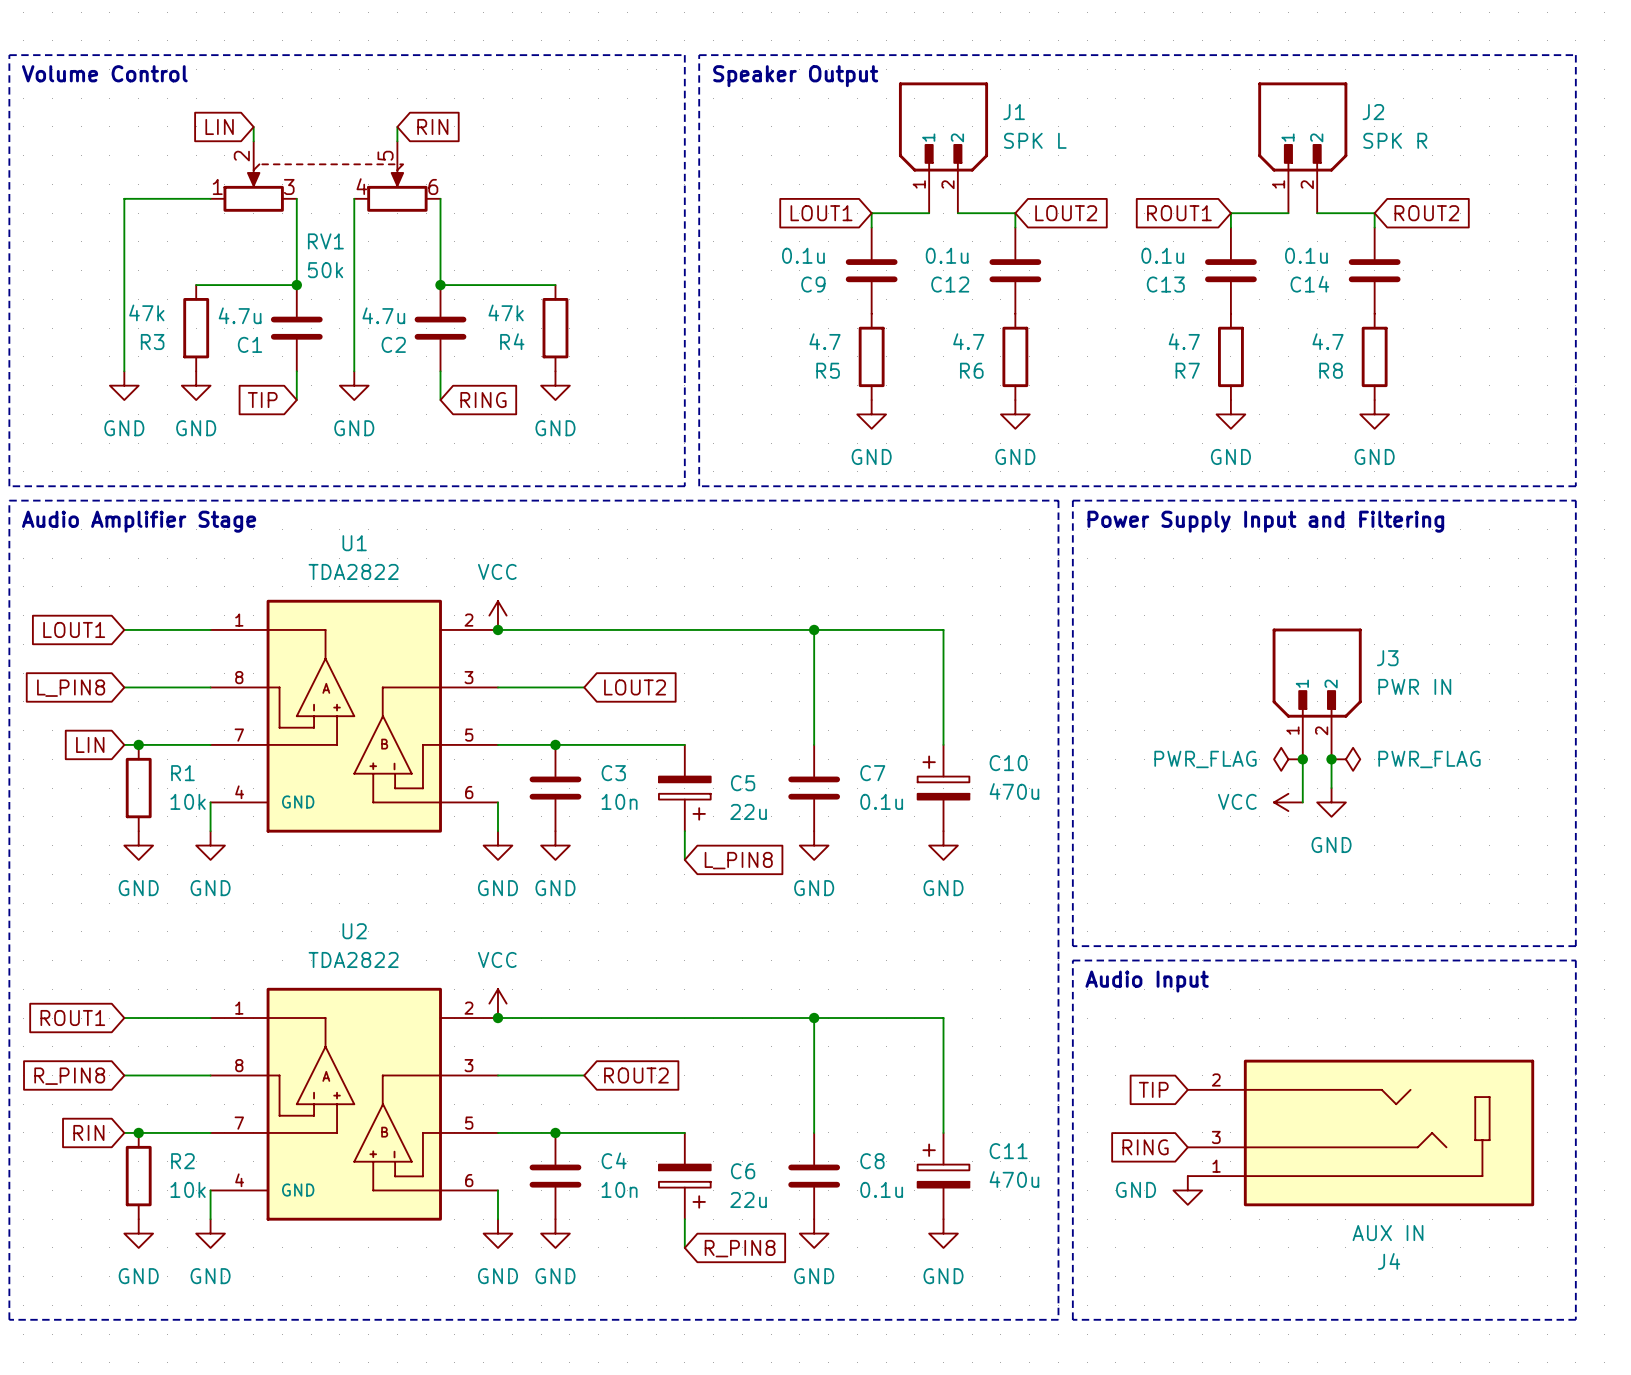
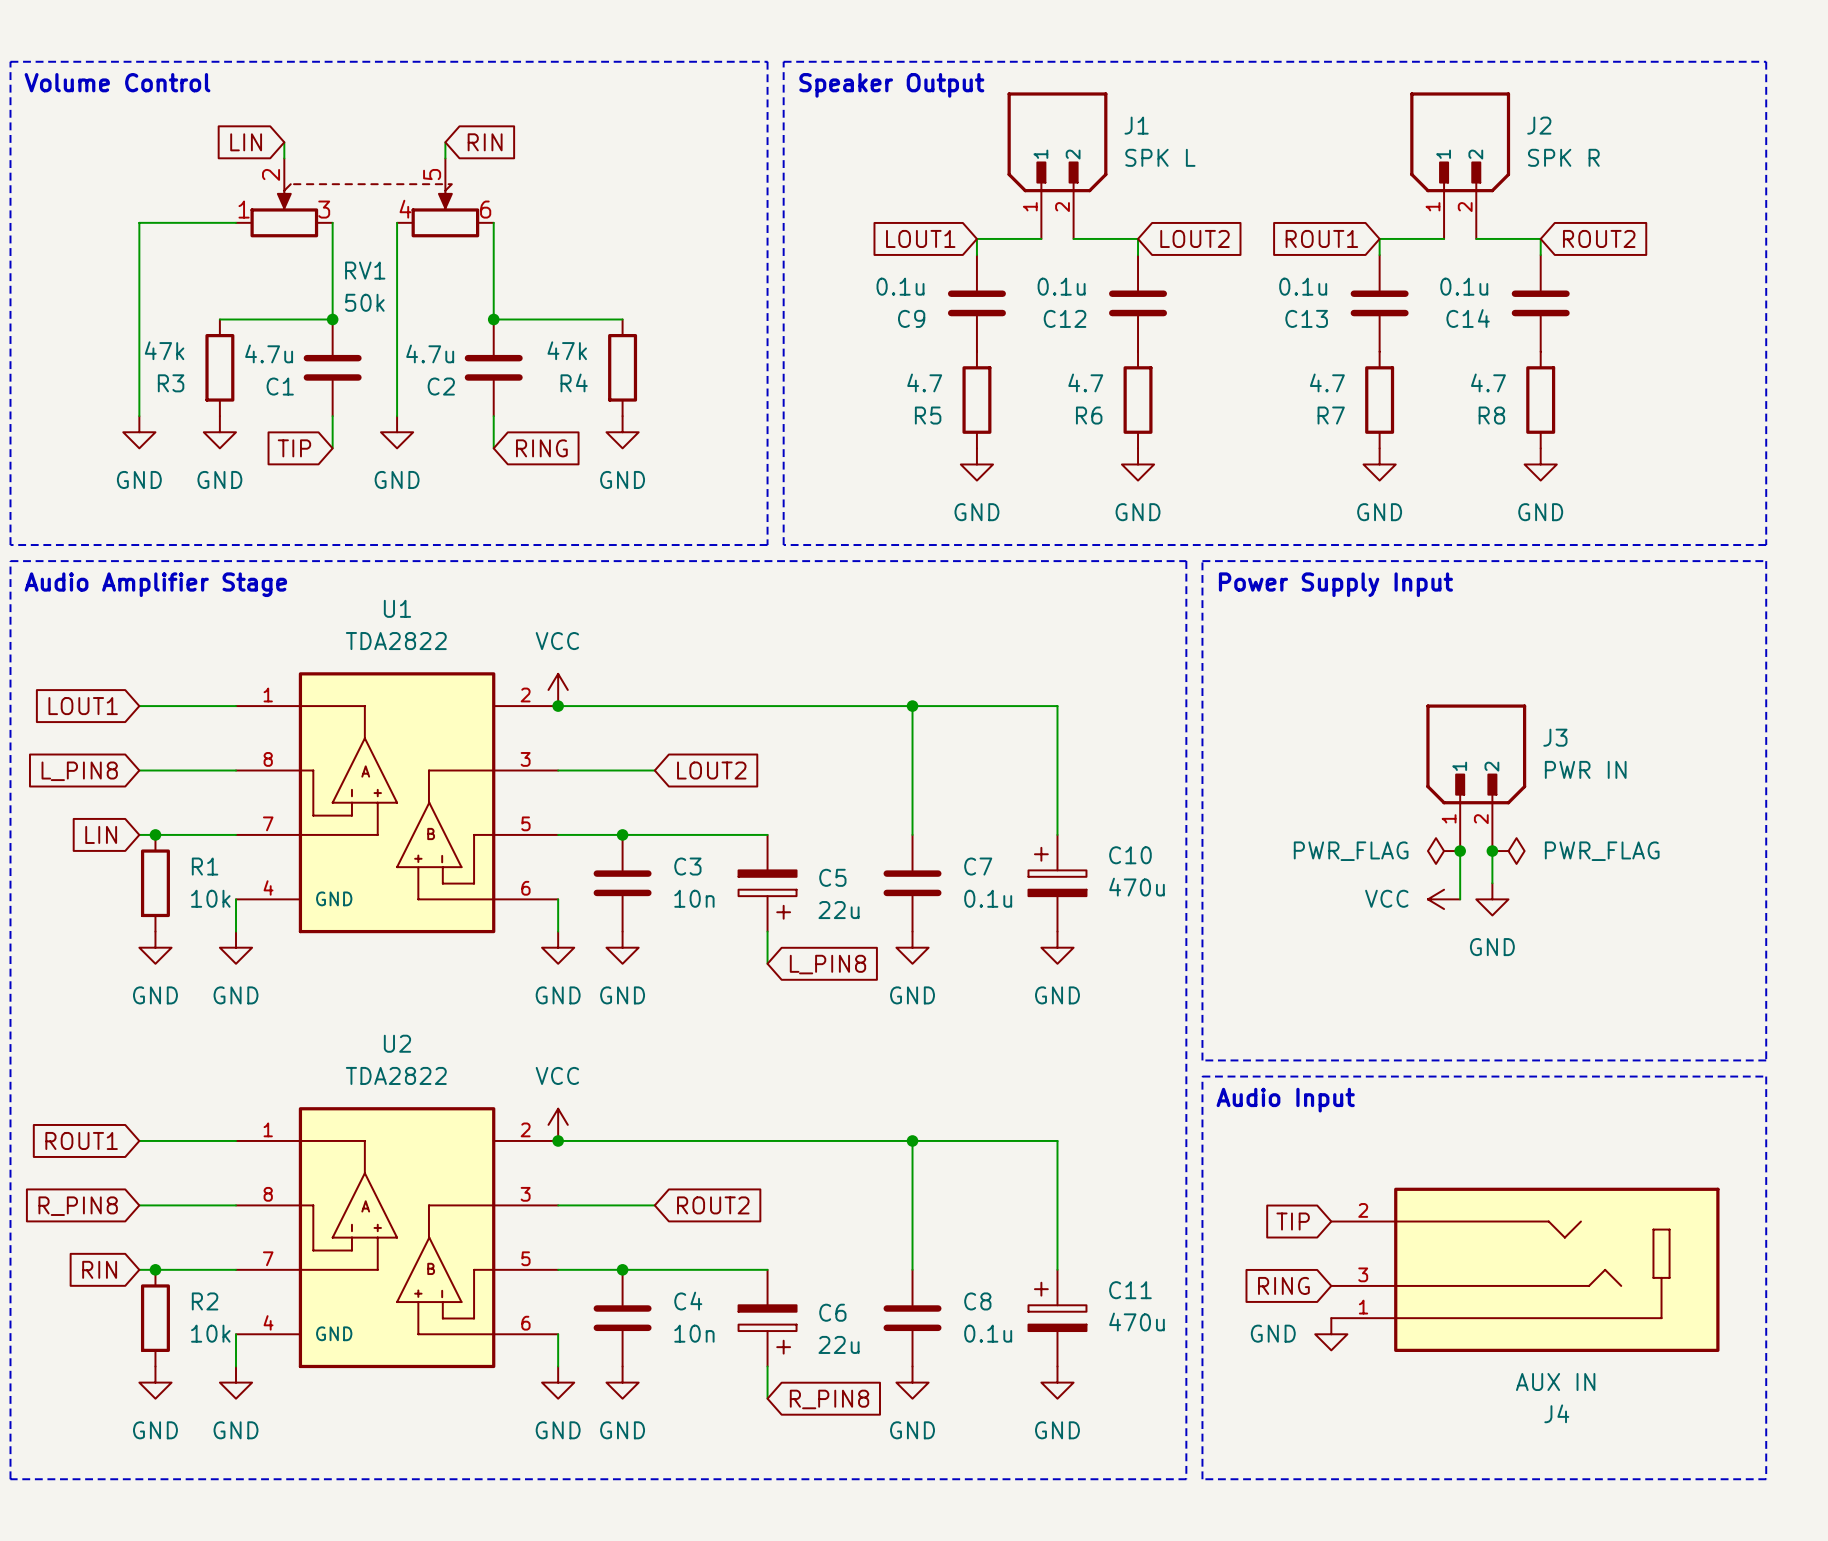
text: Power Supply Input and Filtering (1265, 521) -> Power Supply Input (1335, 584)

